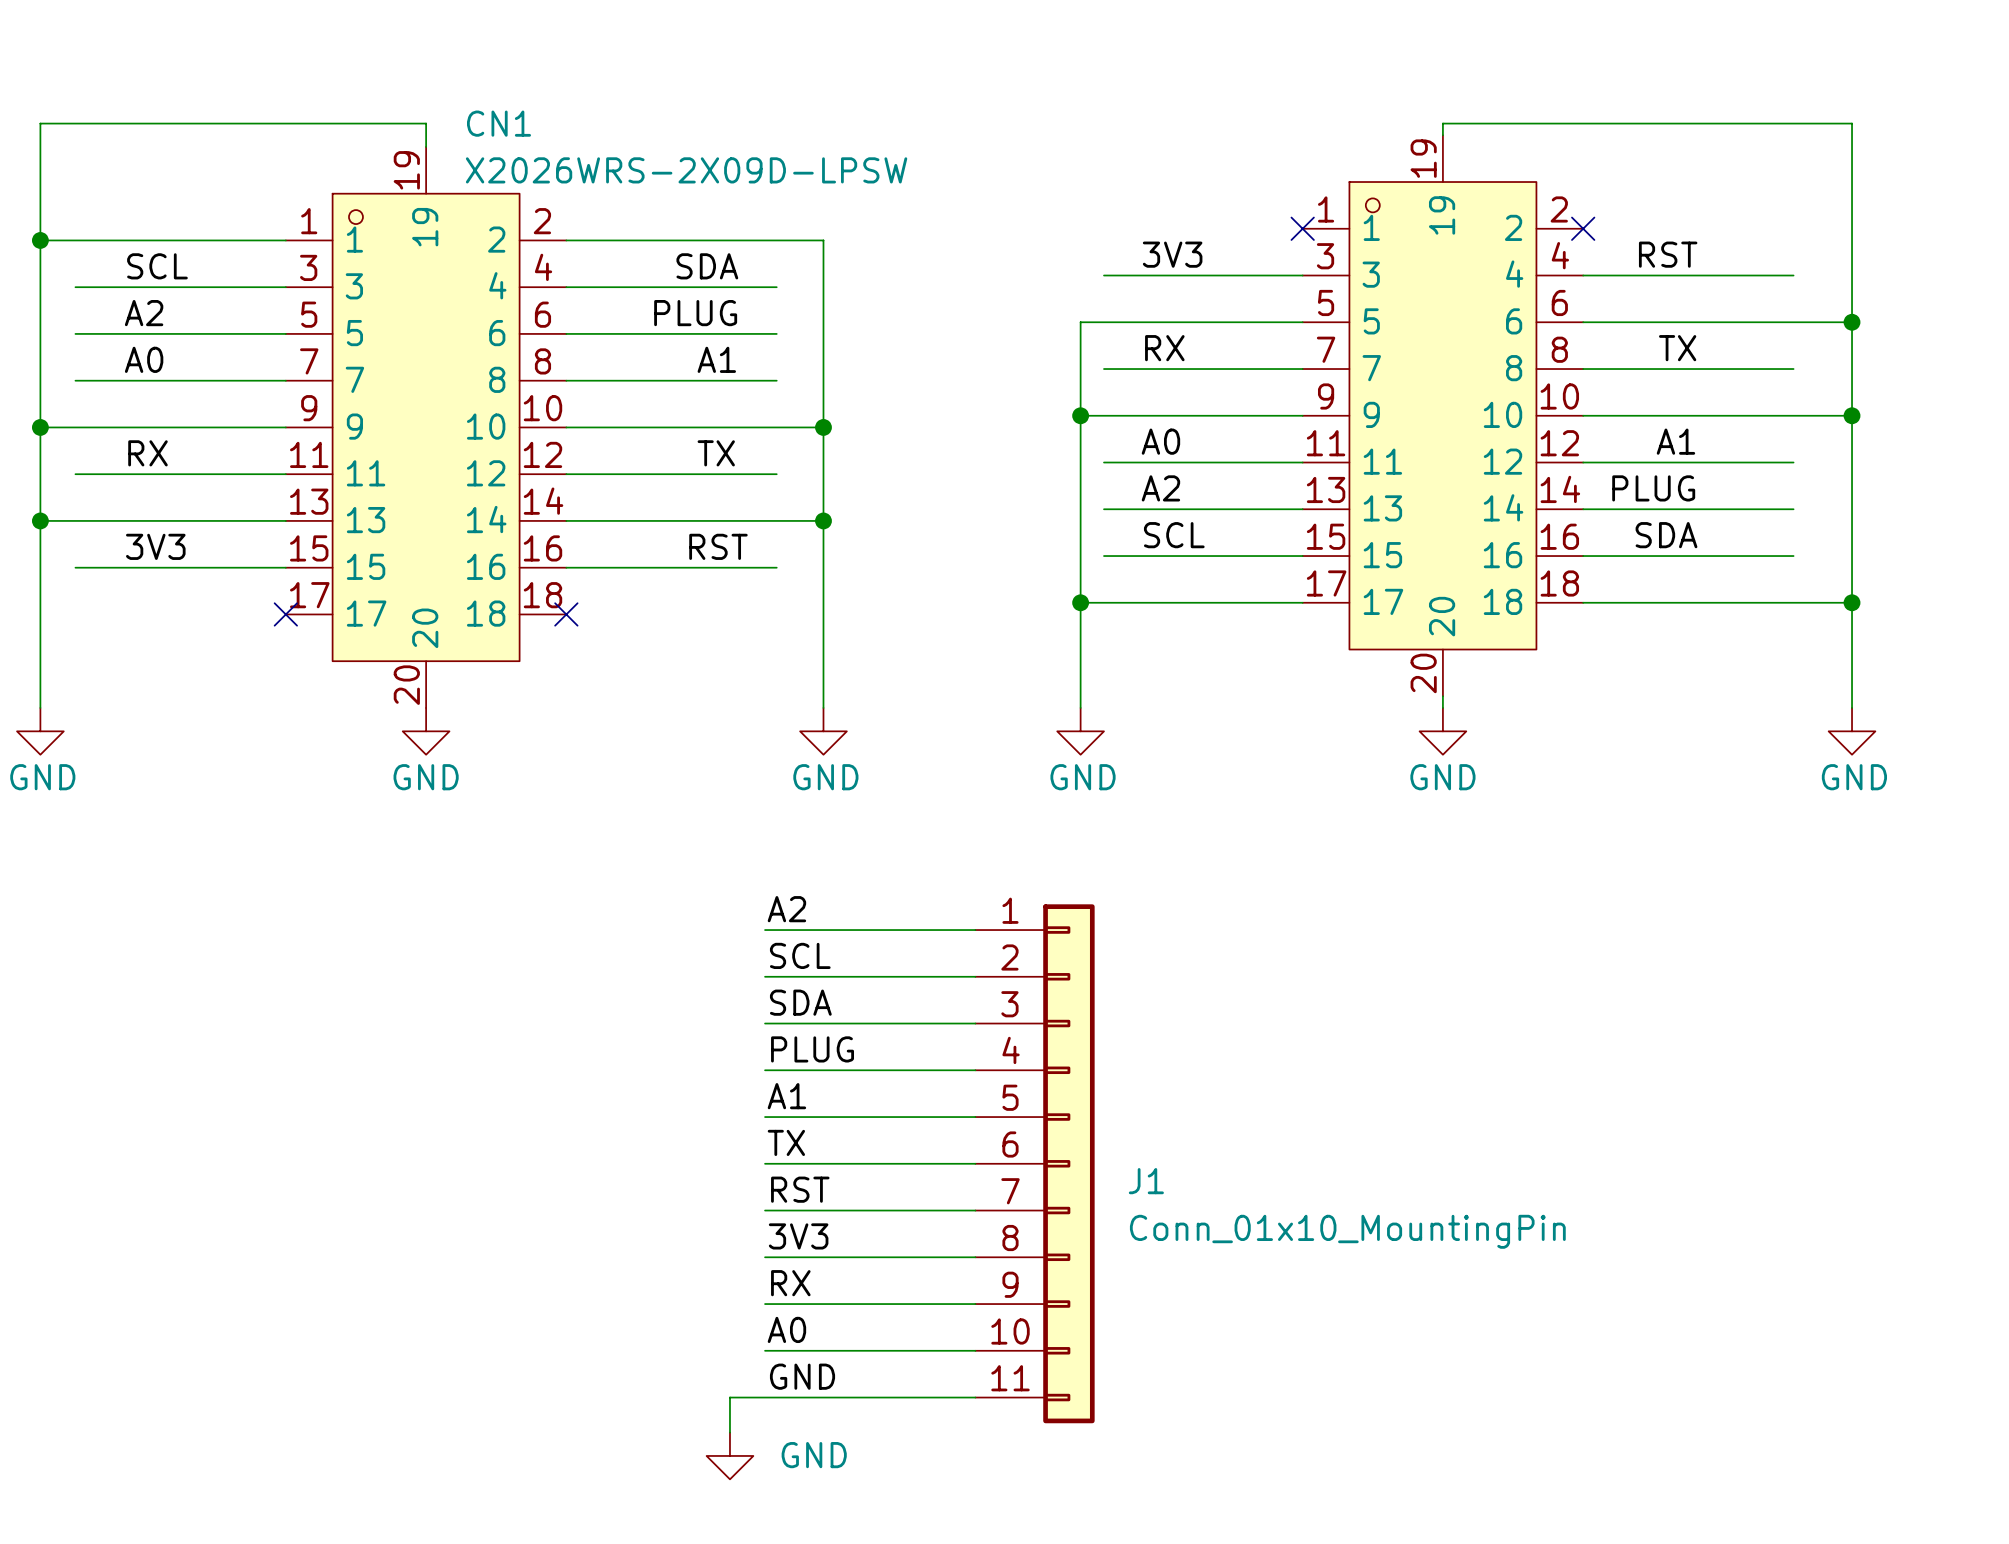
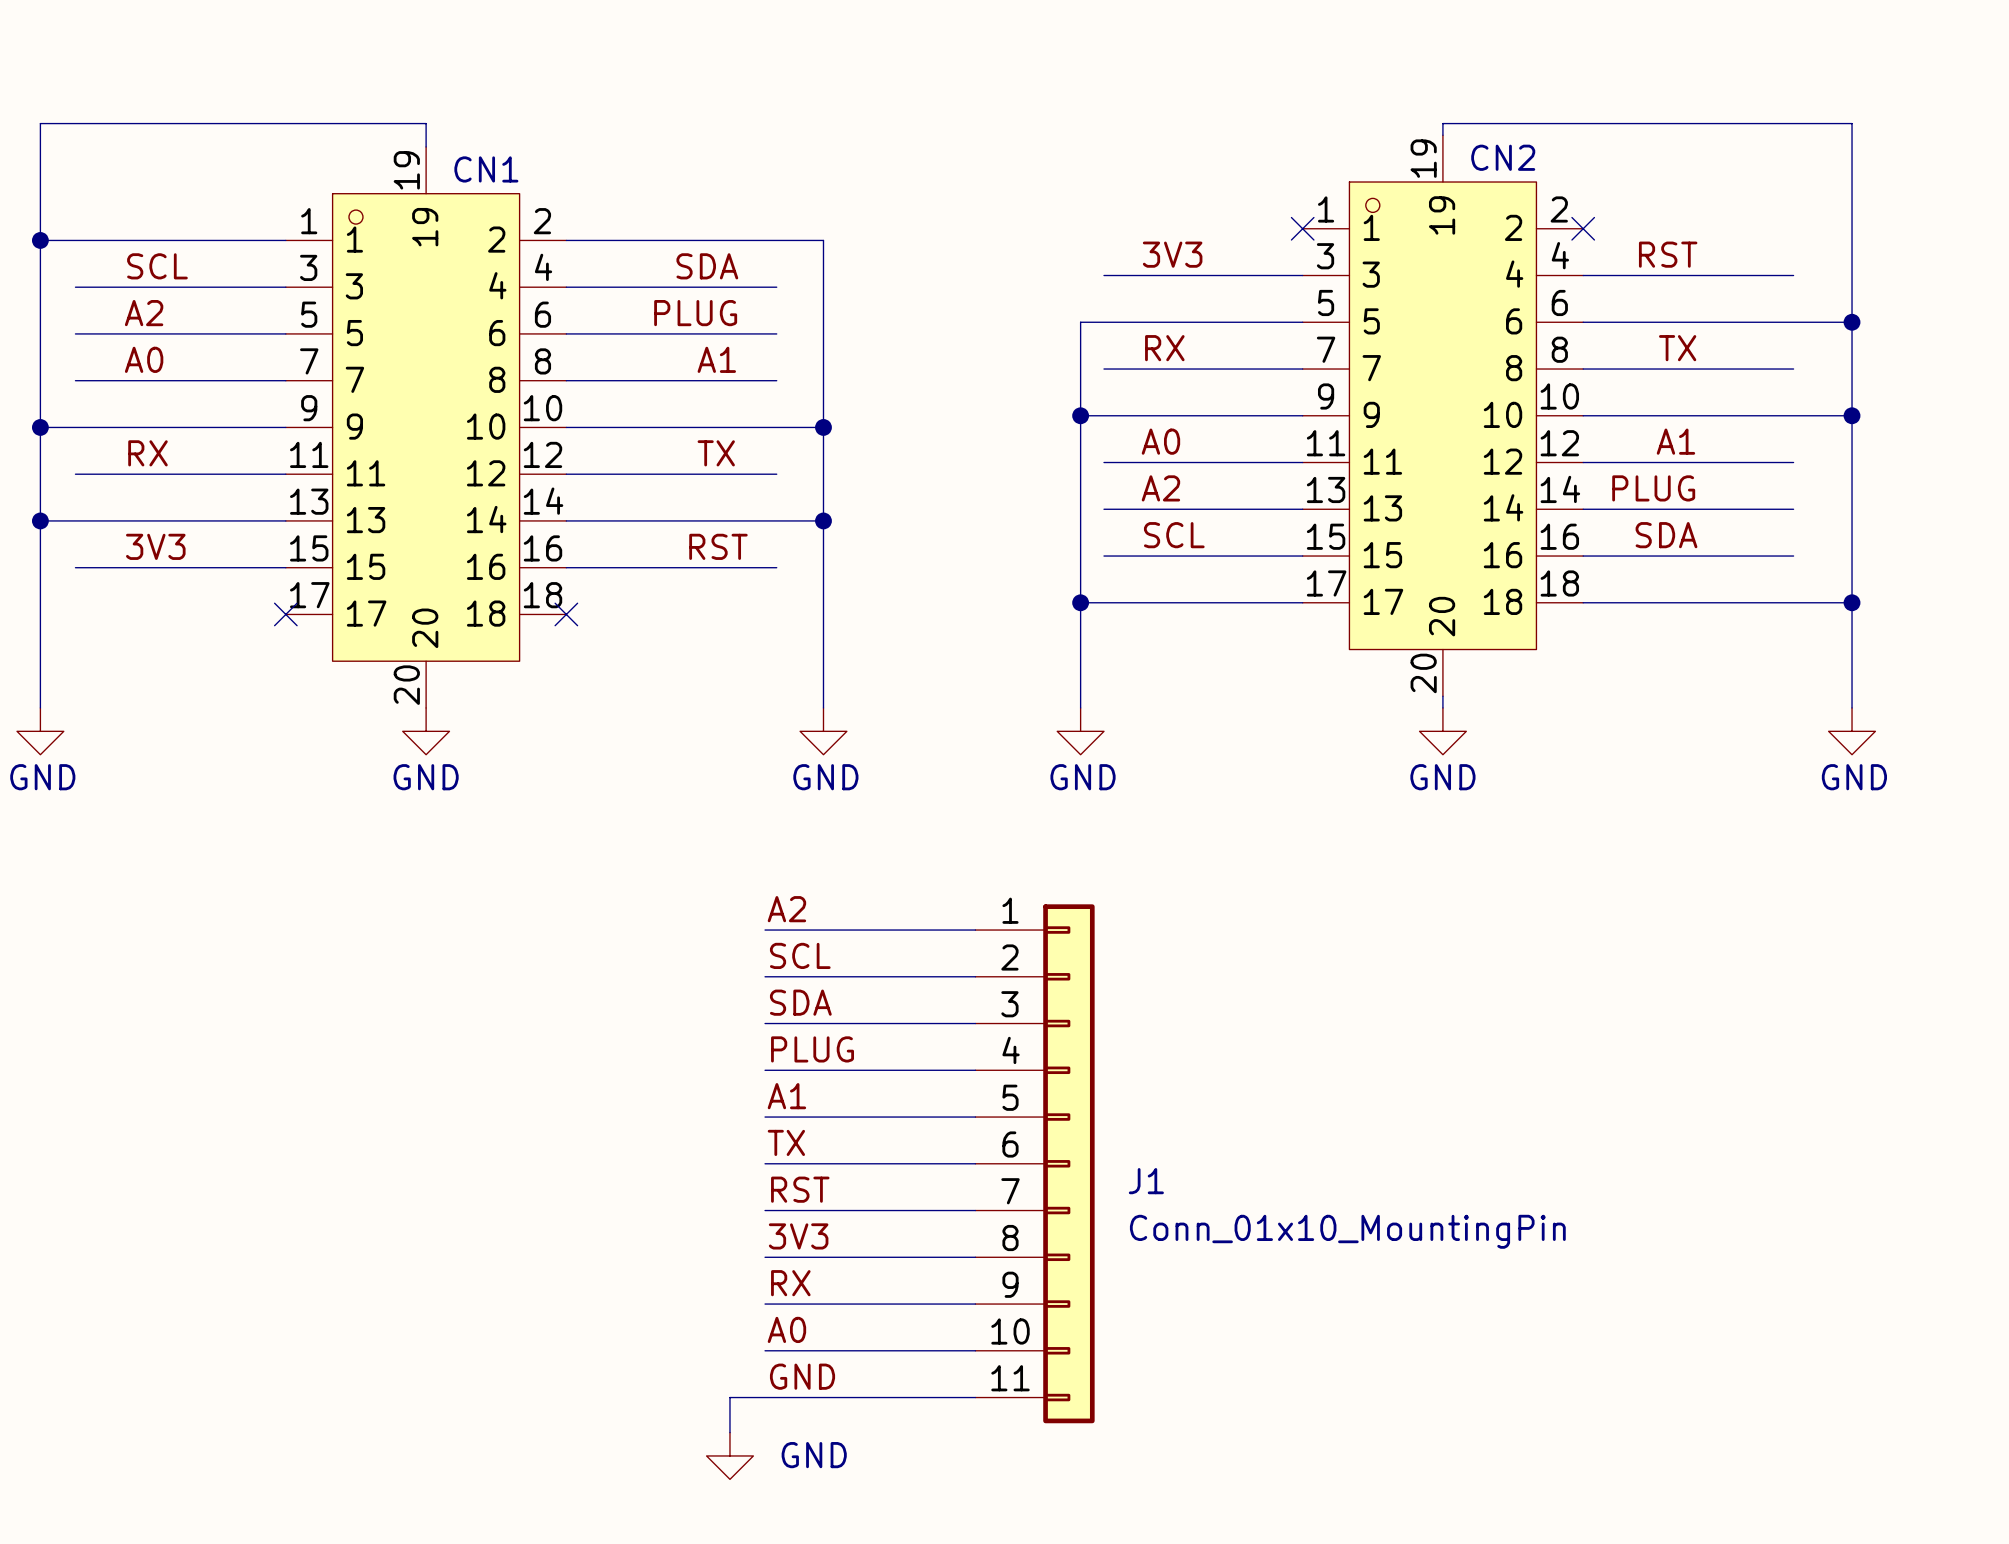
CN1 name position: CN1 (499, 123) -> CN1 (486, 169)
CN2 name: none -> CN2 (1503, 157)
CN1 value: X2026WRS-2X09D-LPSW (686, 170) -> none

